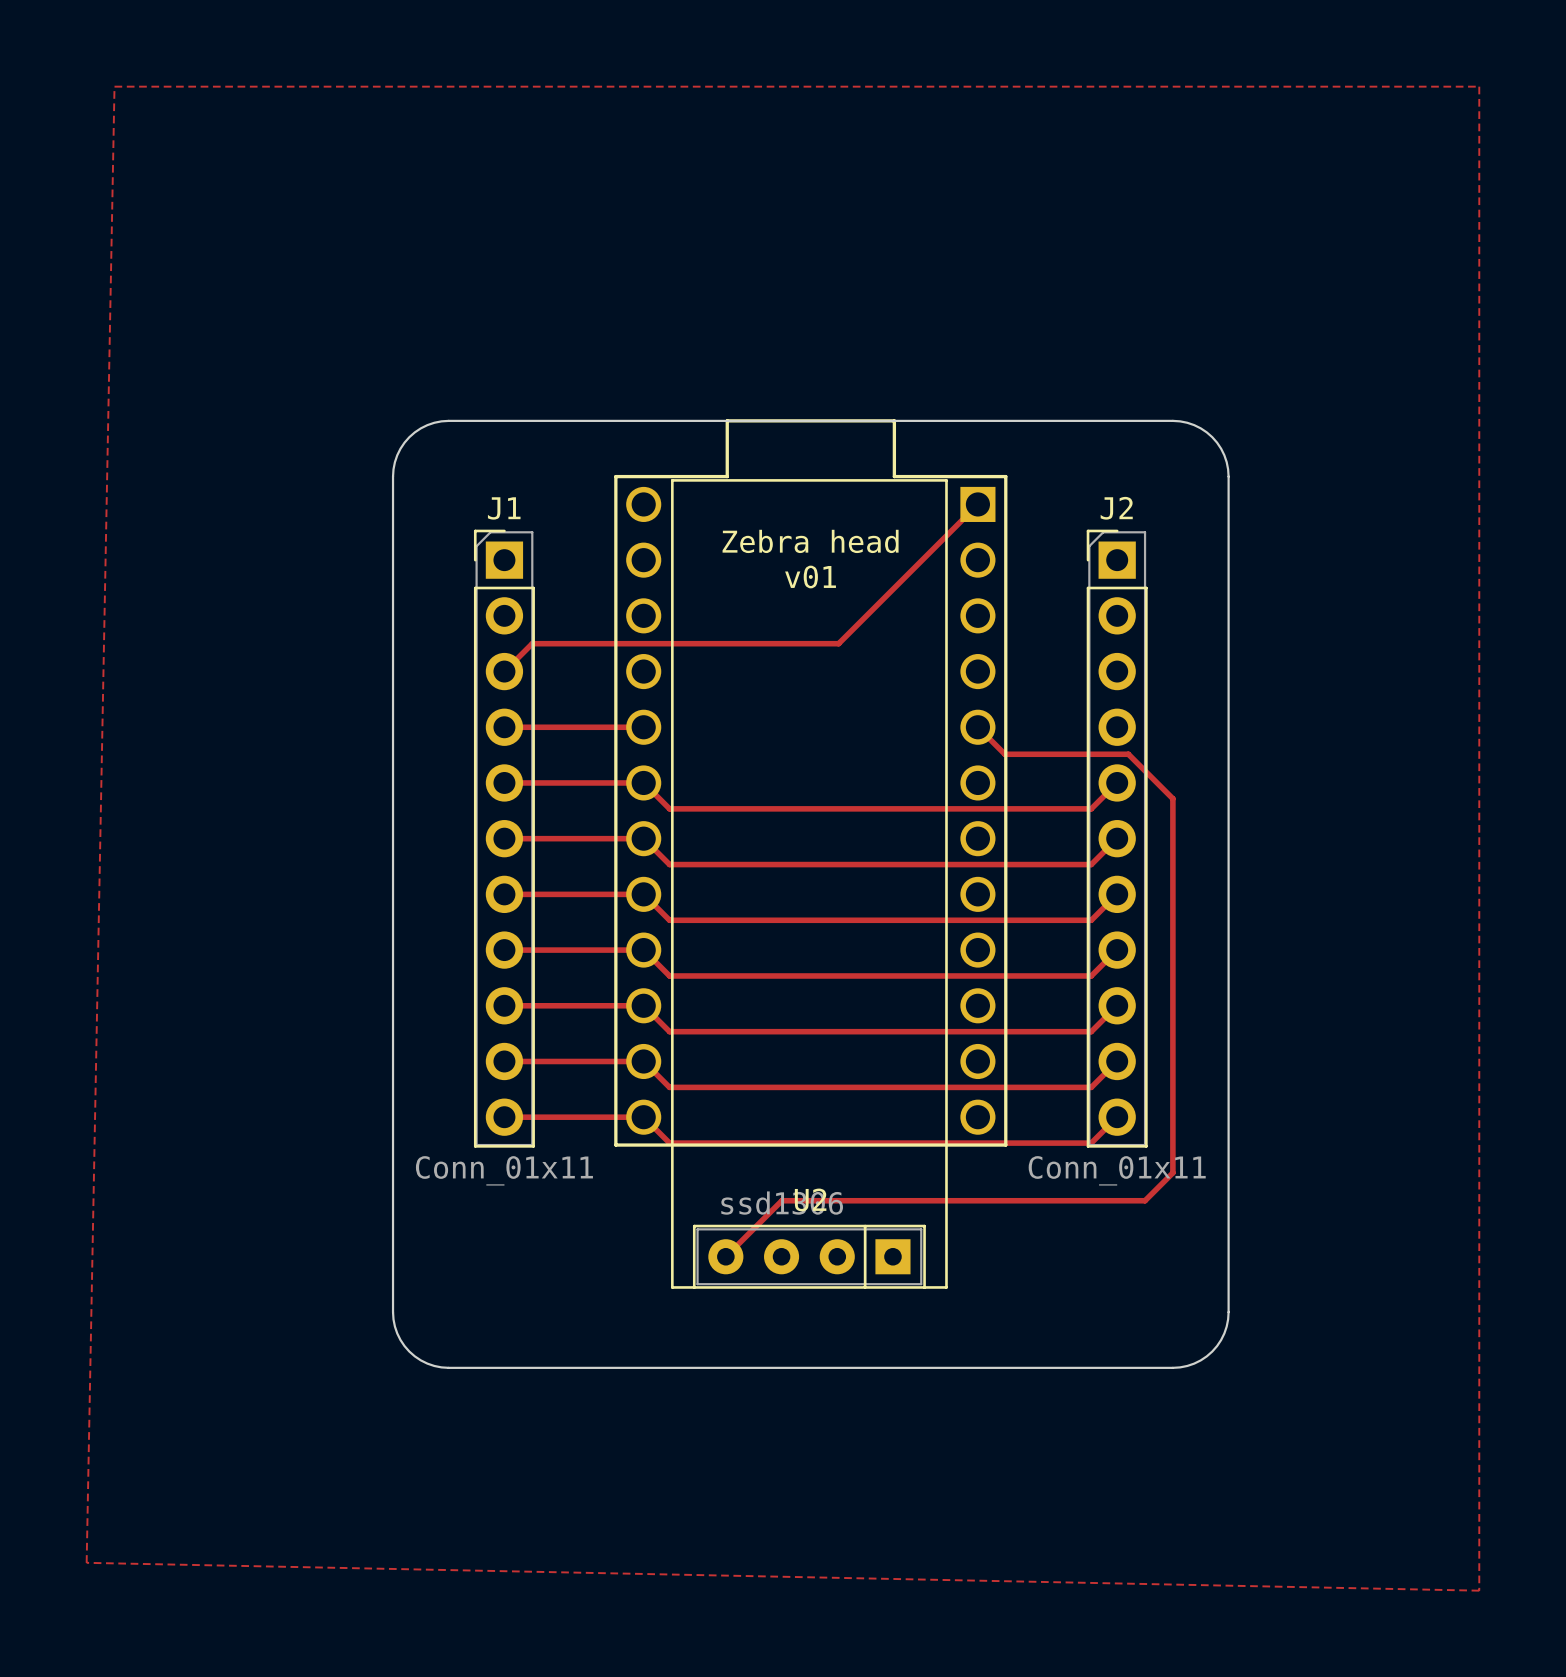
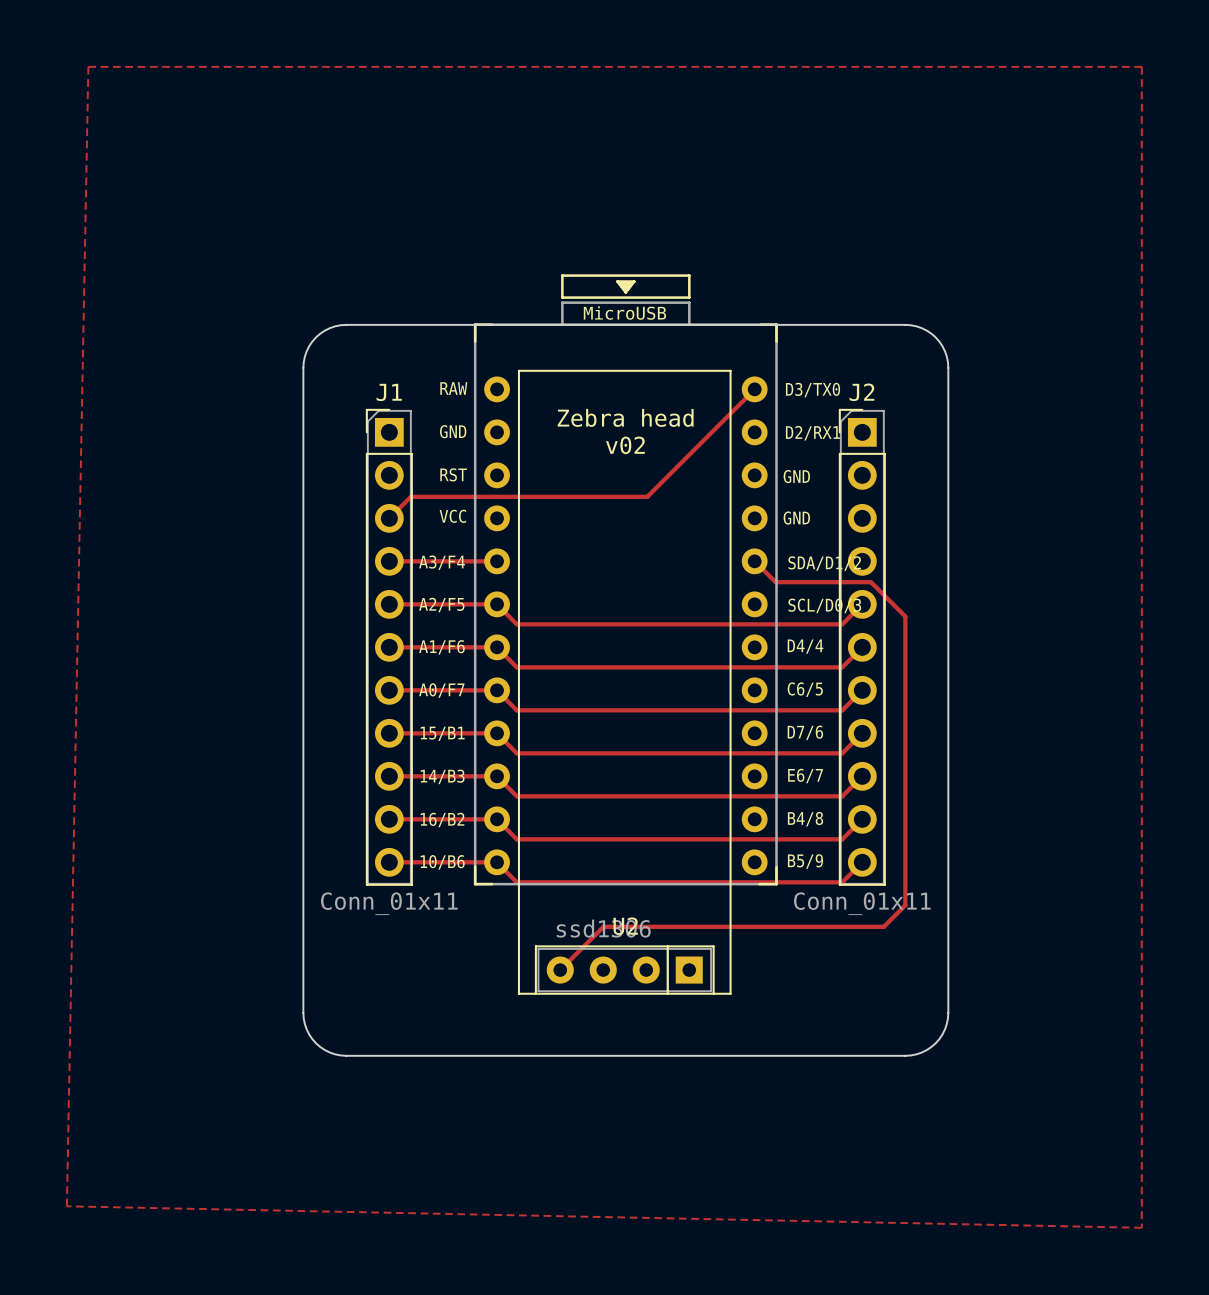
text: v01 (810, 577) -> v02 (625, 445)
part: none -> (625, 579)
part: (810, 782) -> none

